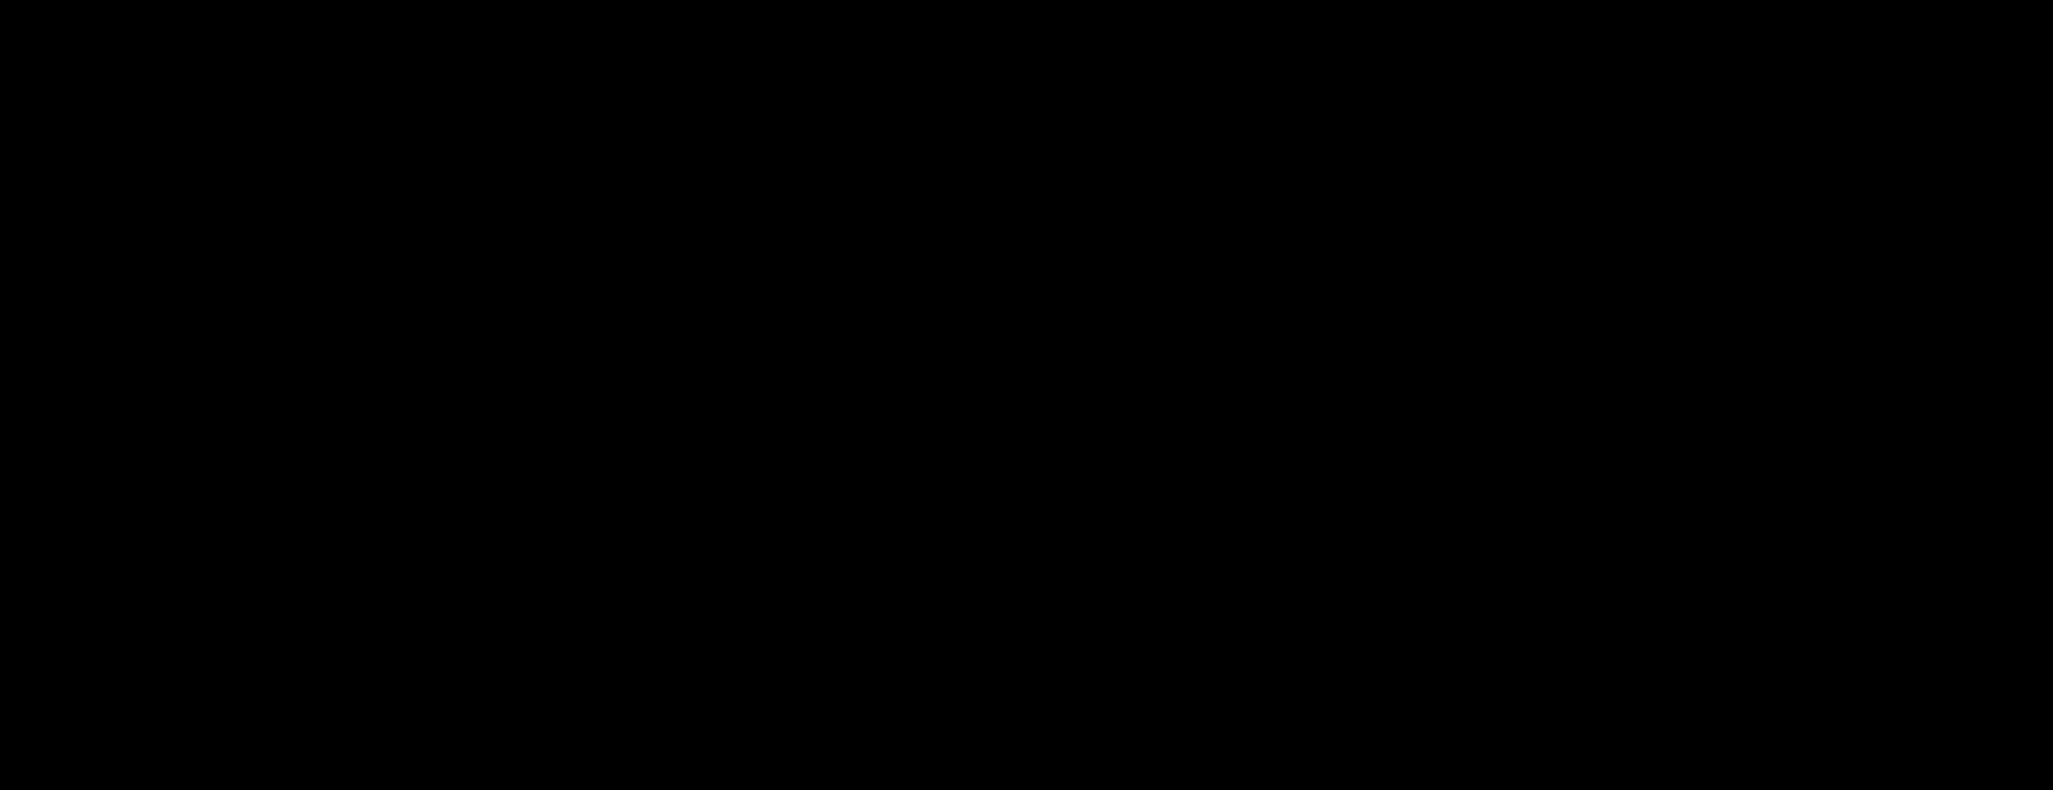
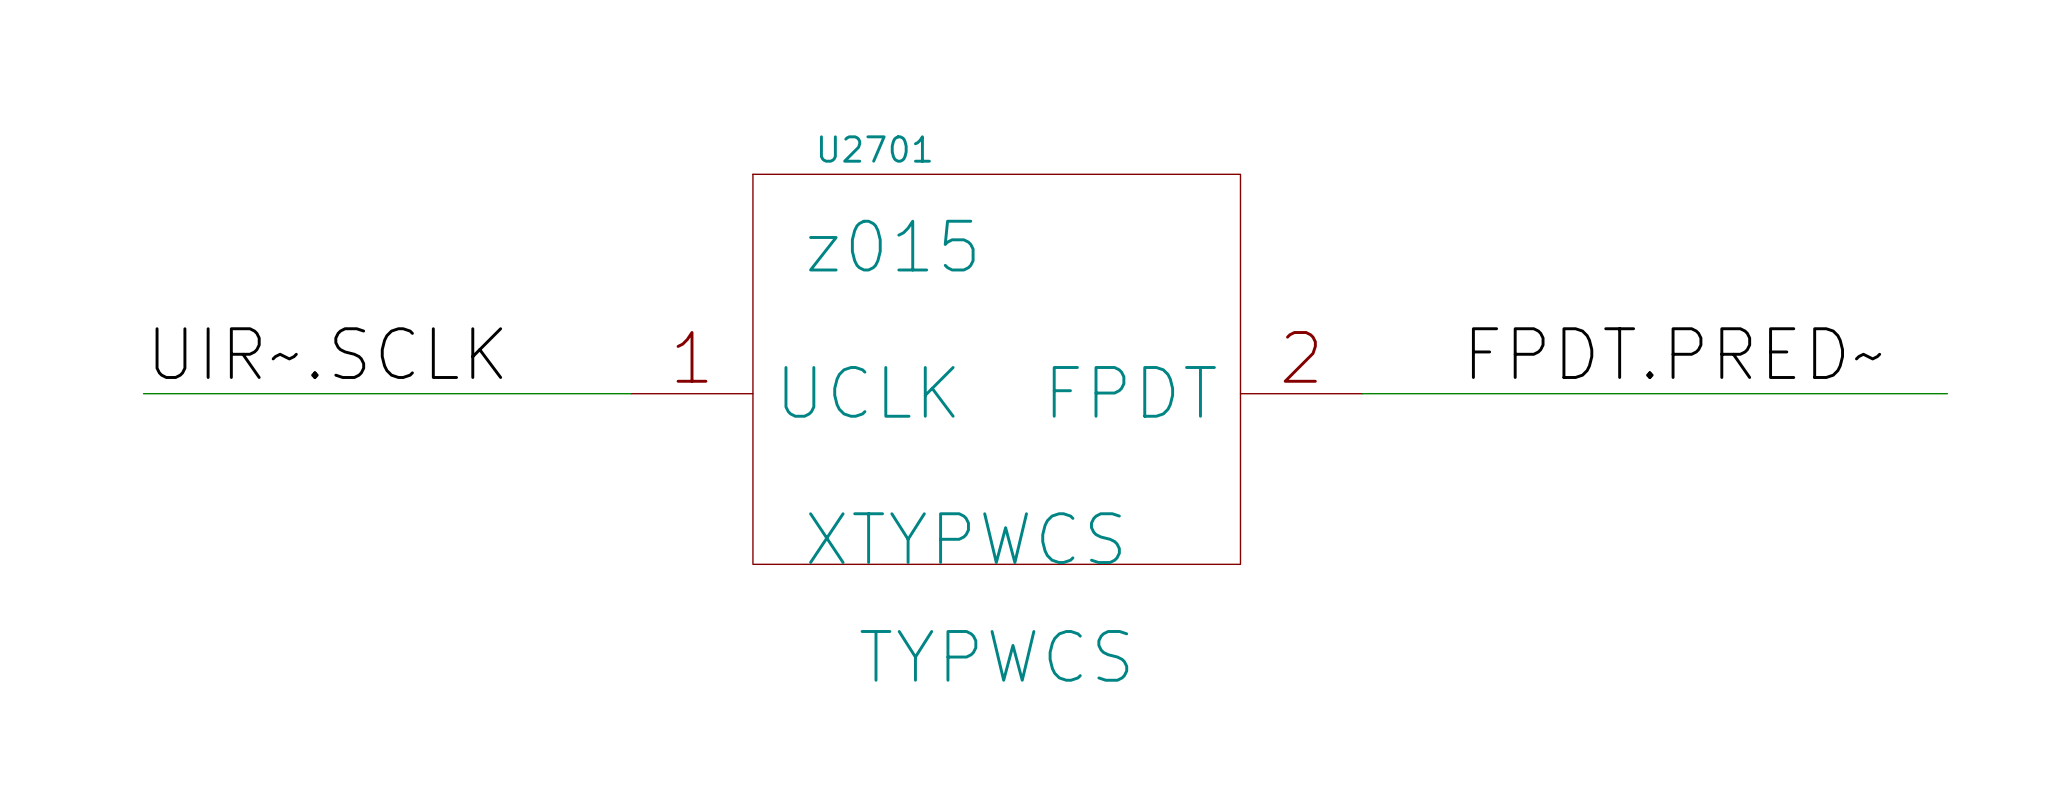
label: none -> UIR~.SCLK (328, 353)
label: none -> FPDT.PRED~ (1676, 353)
U2701: none -> XTYPWCS (996, 369)
wire: none -> (143, 393) (631, 393)
wire: none -> (1362, 393) (1947, 393)

